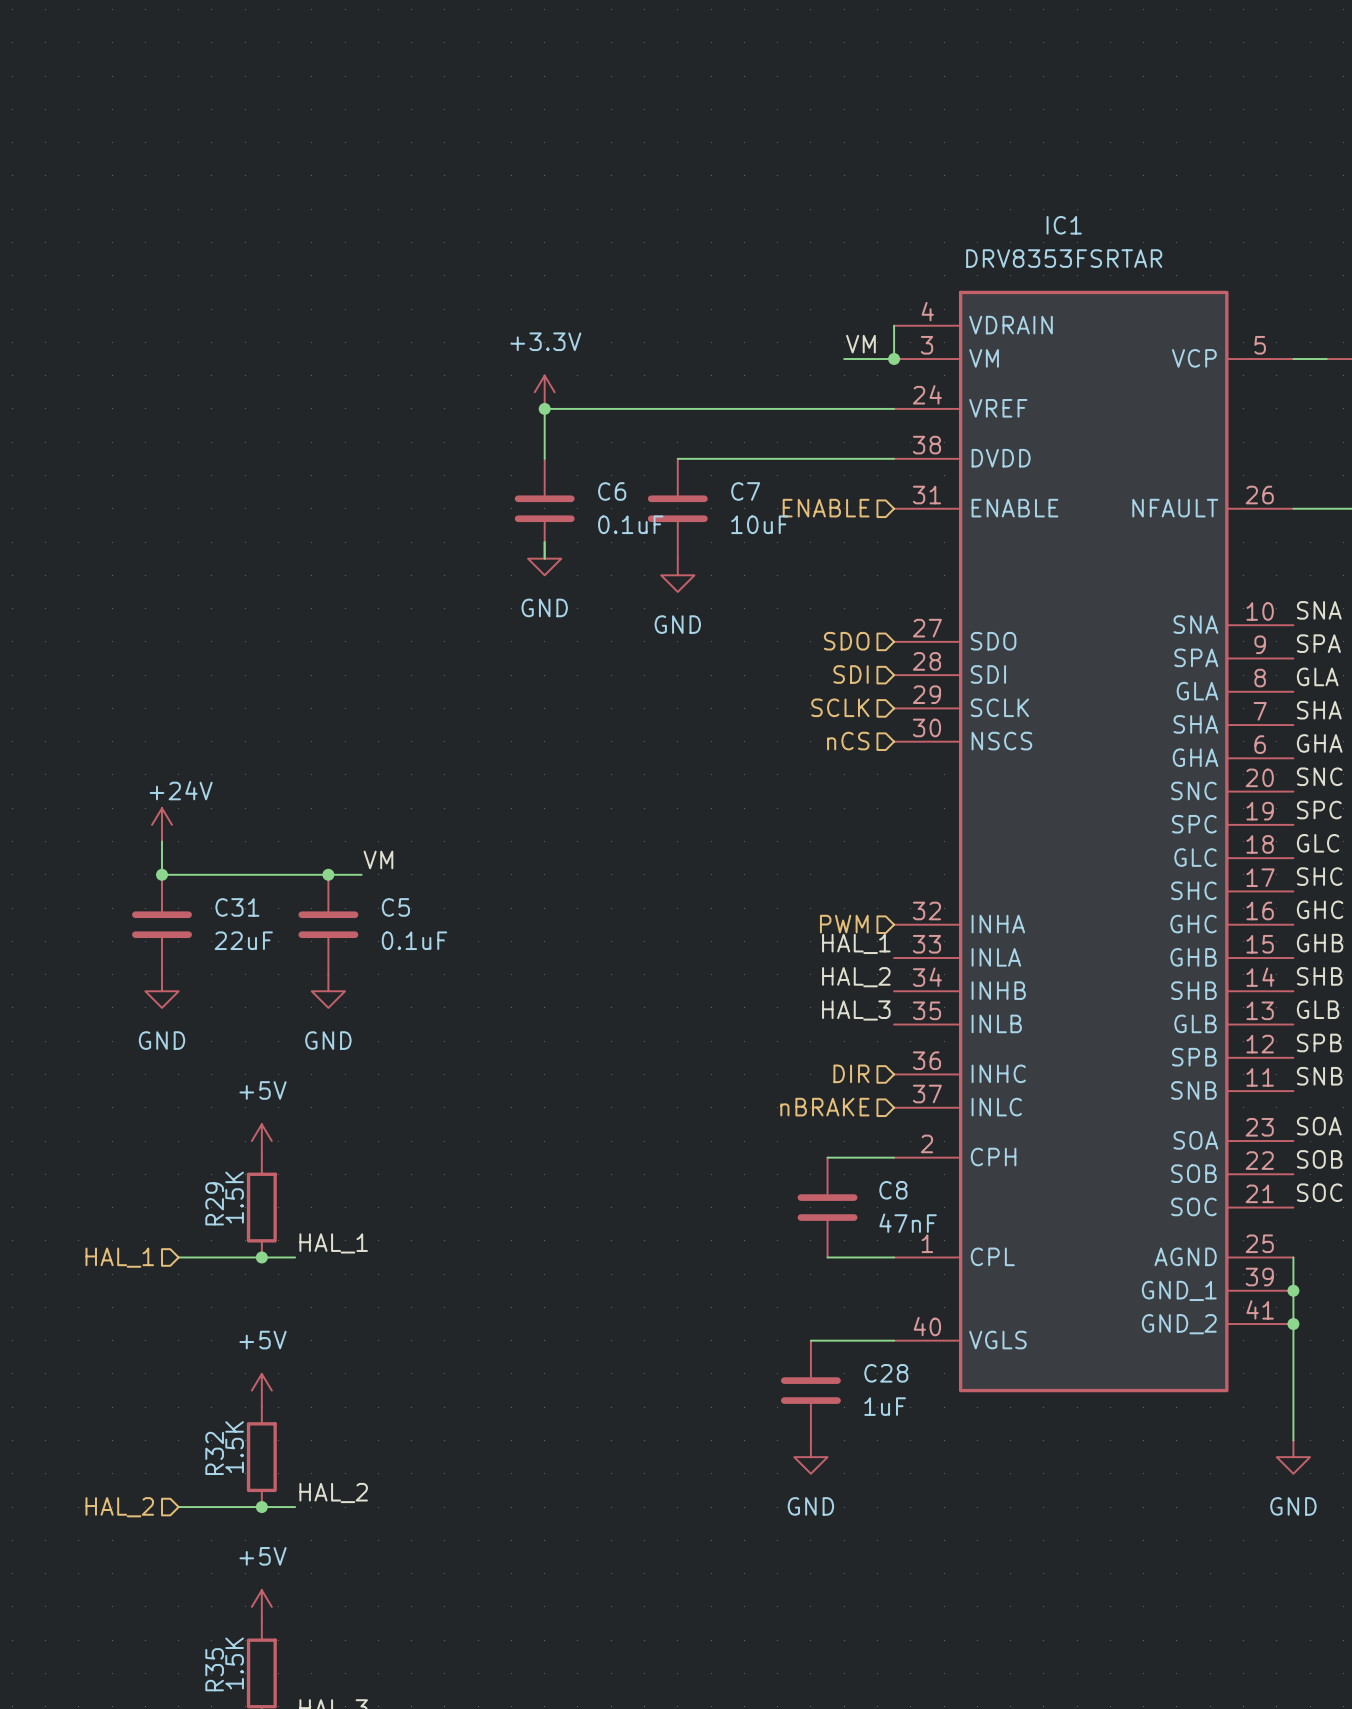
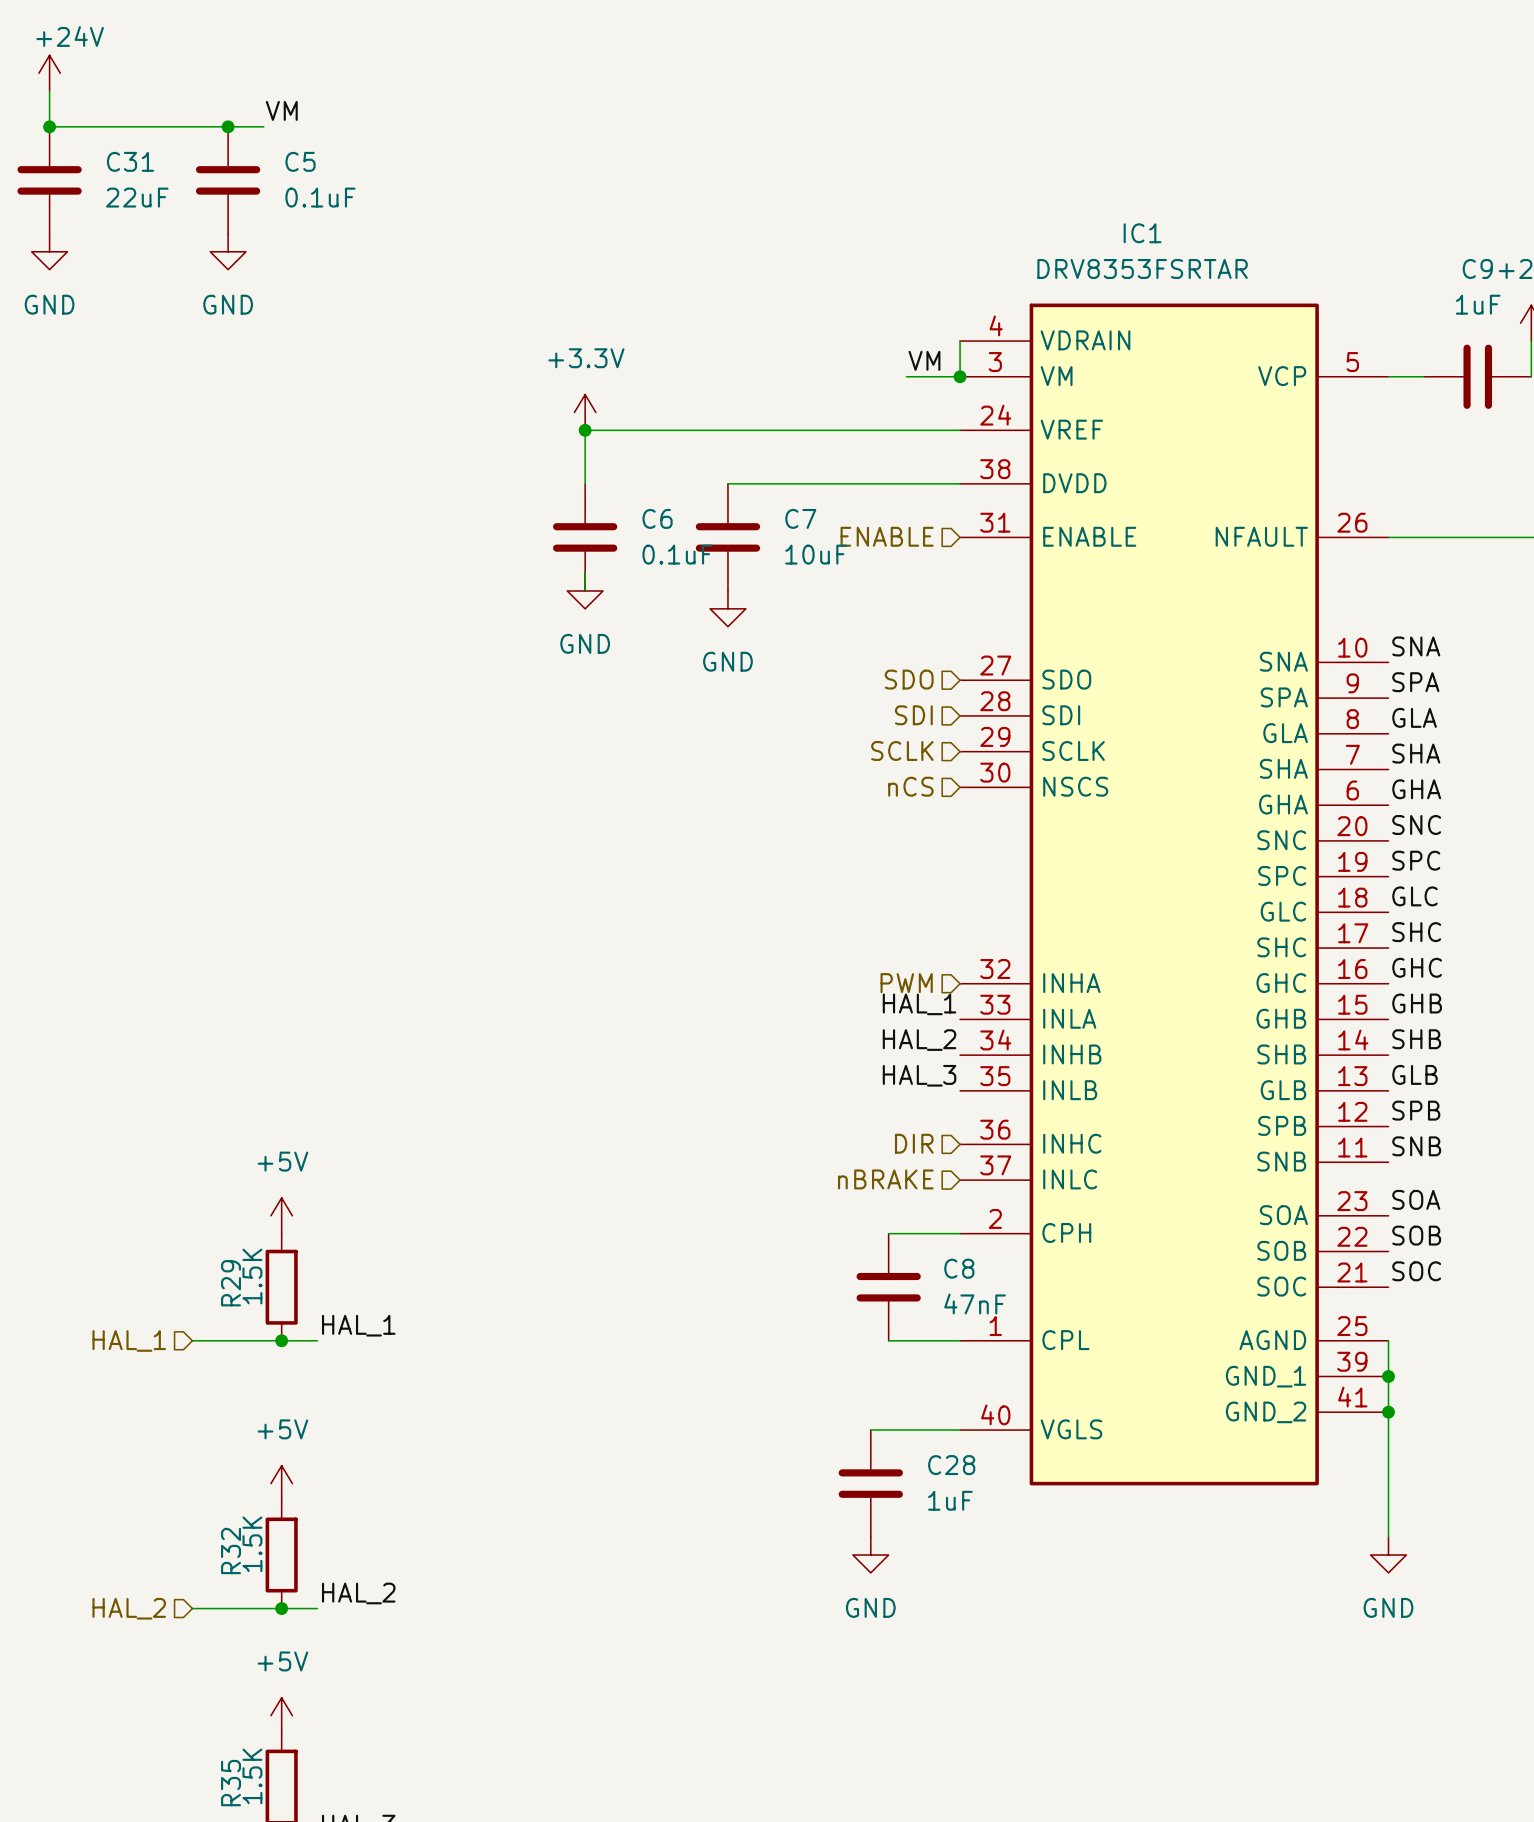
power symbol: none -> +24V (49, 73)
wire: none -> (49, 91) (49, 126) (263, 126)
label: none -> VM (281, 110)
junction: none -> (49, 126)
junction: none -> (228, 126)
power symbol: none -> GND (49, 251)
power symbol: none -> GND (228, 251)
power symbol: +24V (162, 824) -> none
wire: (162, 841) (162, 874) (361, 874) -> none
label: VM (378, 859) -> none
junction: (162, 874) -> none
junction: (328, 874) -> none
C31 position: (162, 924) -> (49, 180)
C5 position: (328, 924) -> (228, 180)
power symbol: GND (162, 991) -> none
power symbol: GND (328, 991) -> none

